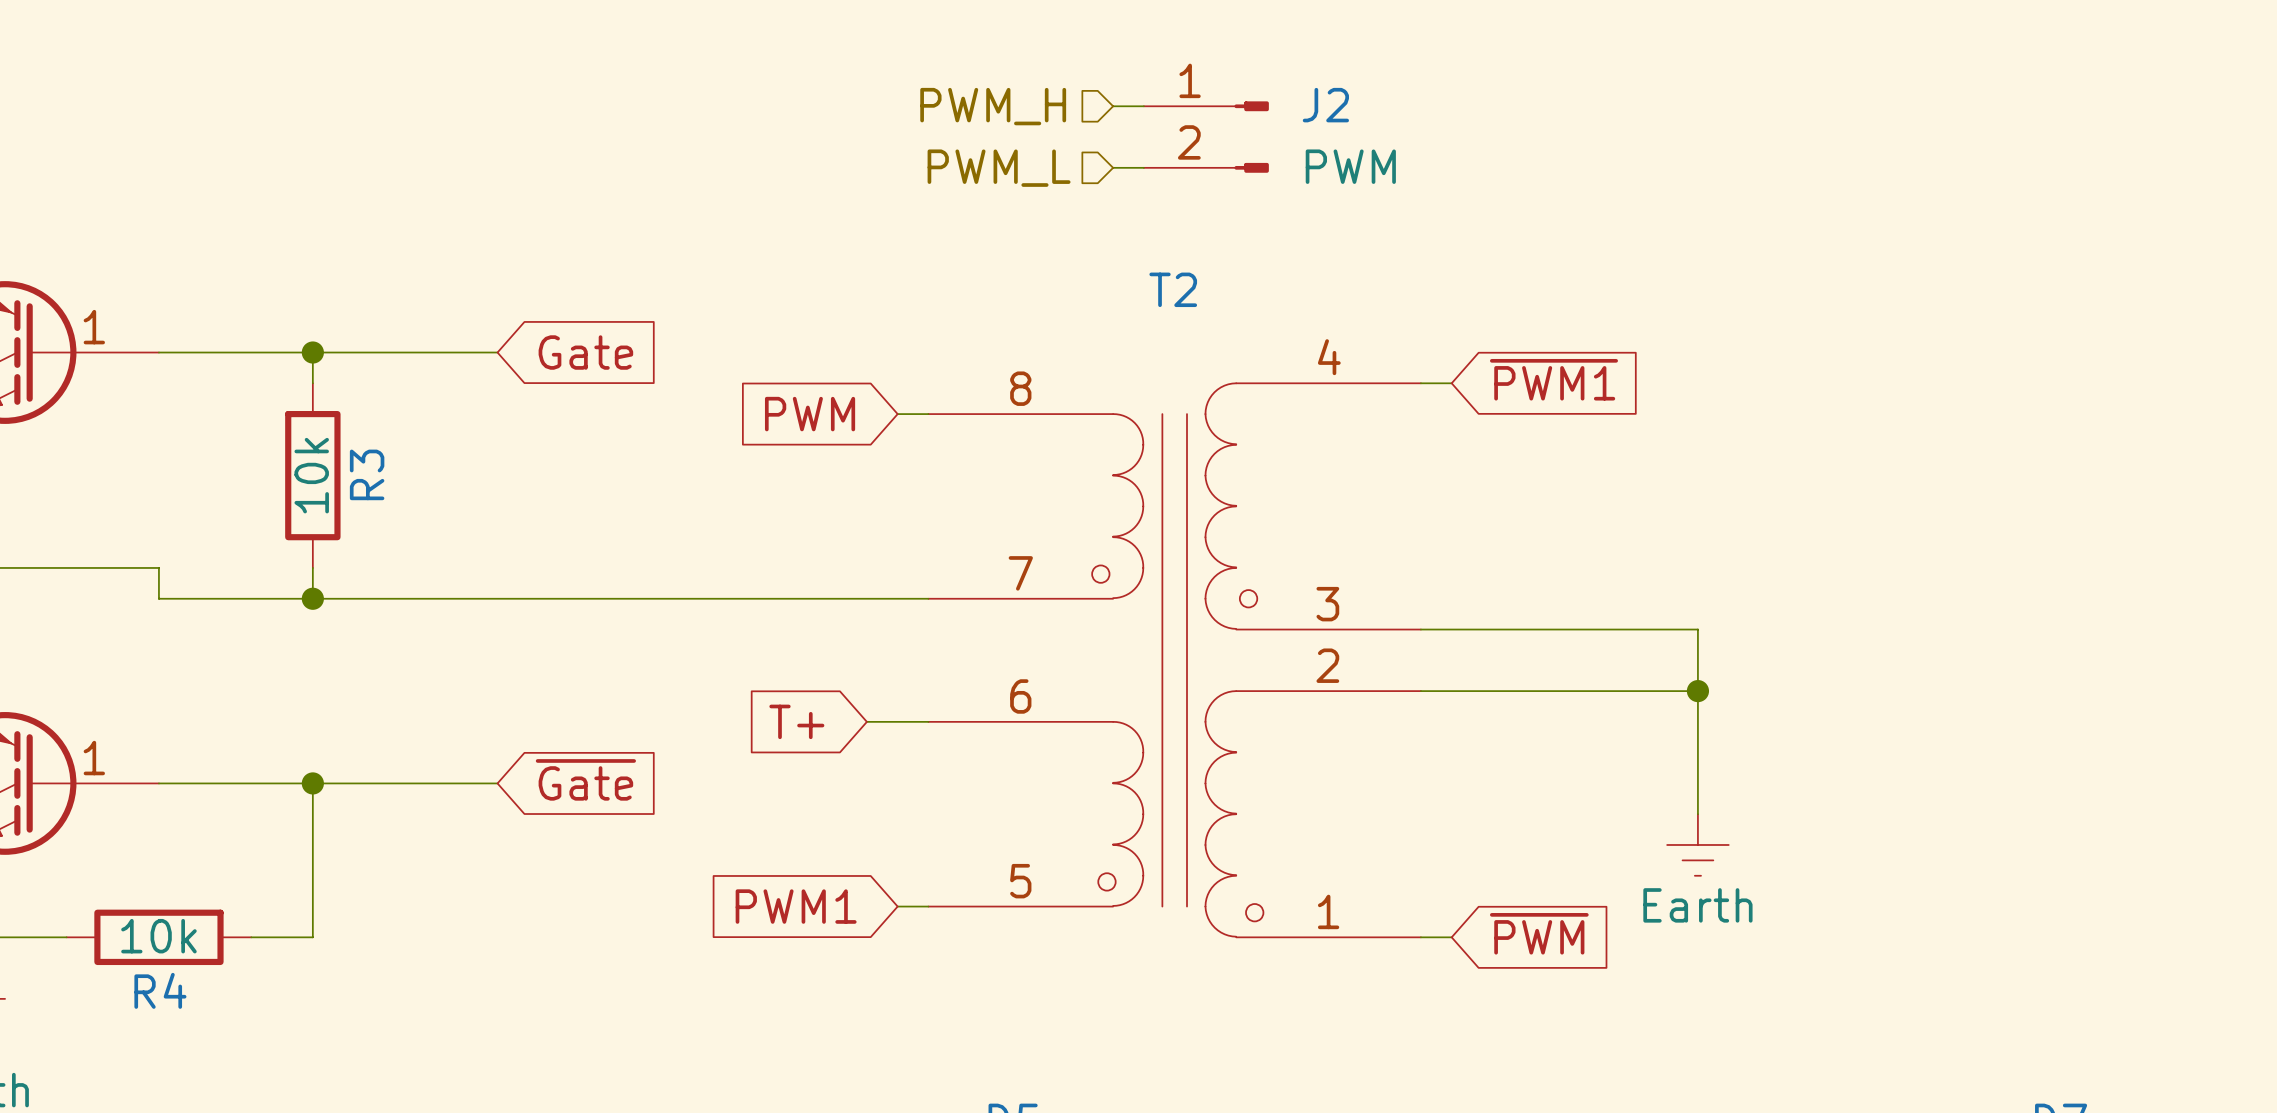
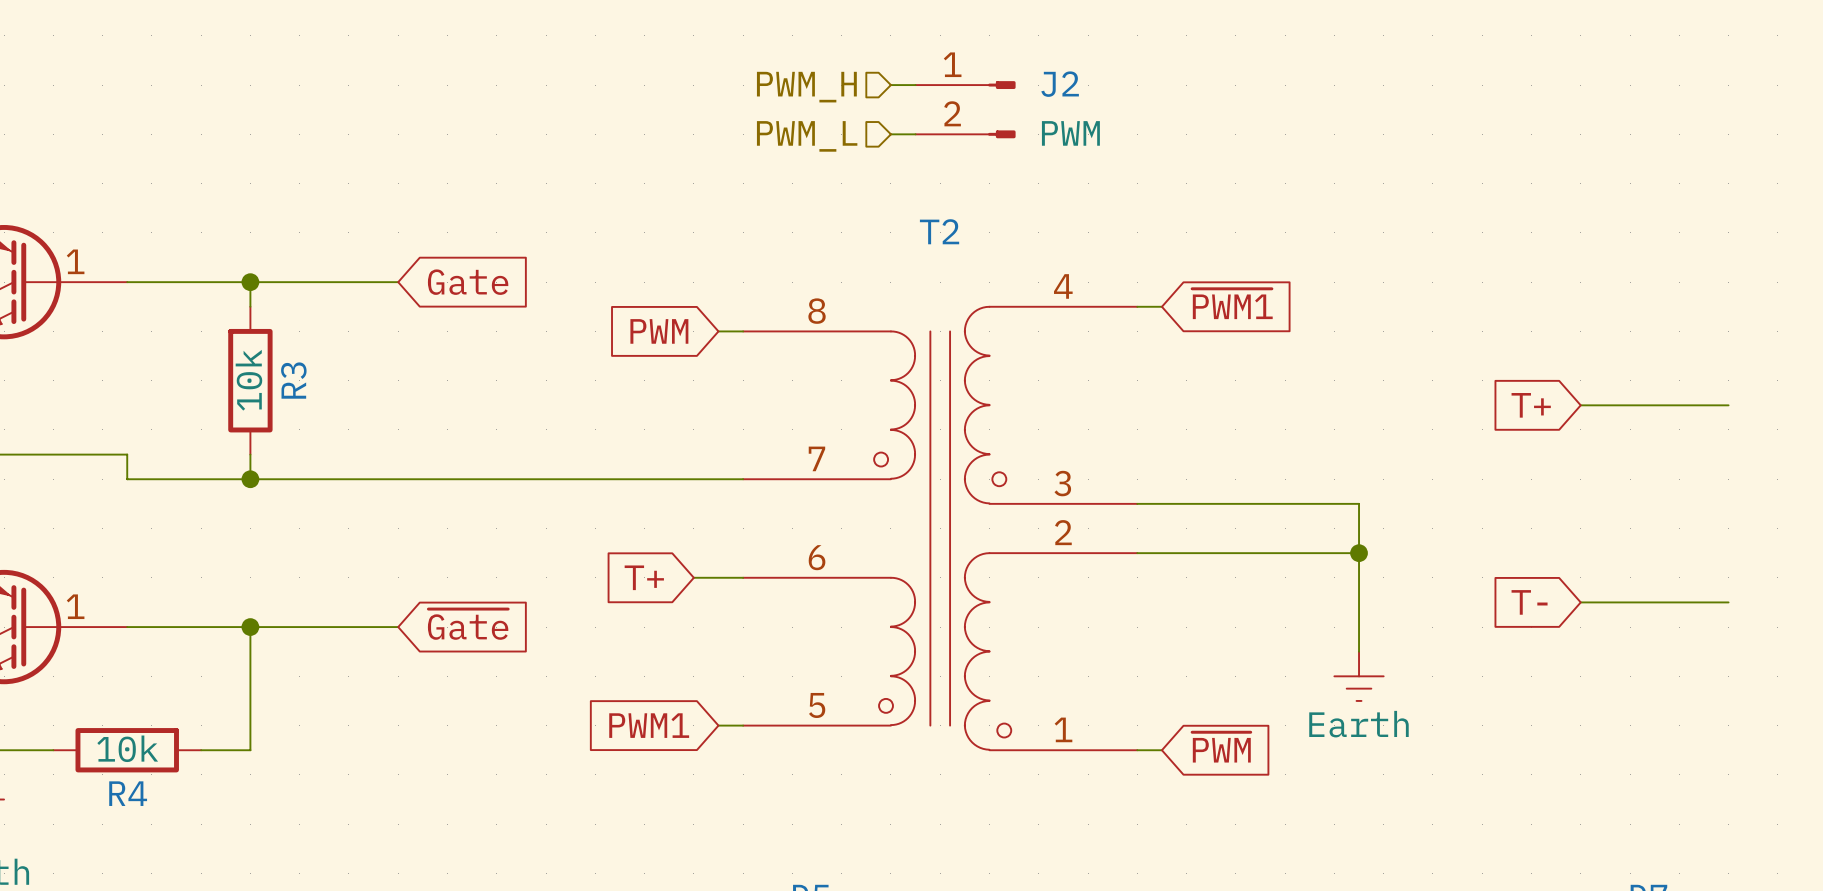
global label: none -> T+ (1531, 405)
wire: none -> (1580, 405) (1728, 405)
global label: none -> T- (1529, 602)
wire: none -> (1580, 602) (1728, 602)

